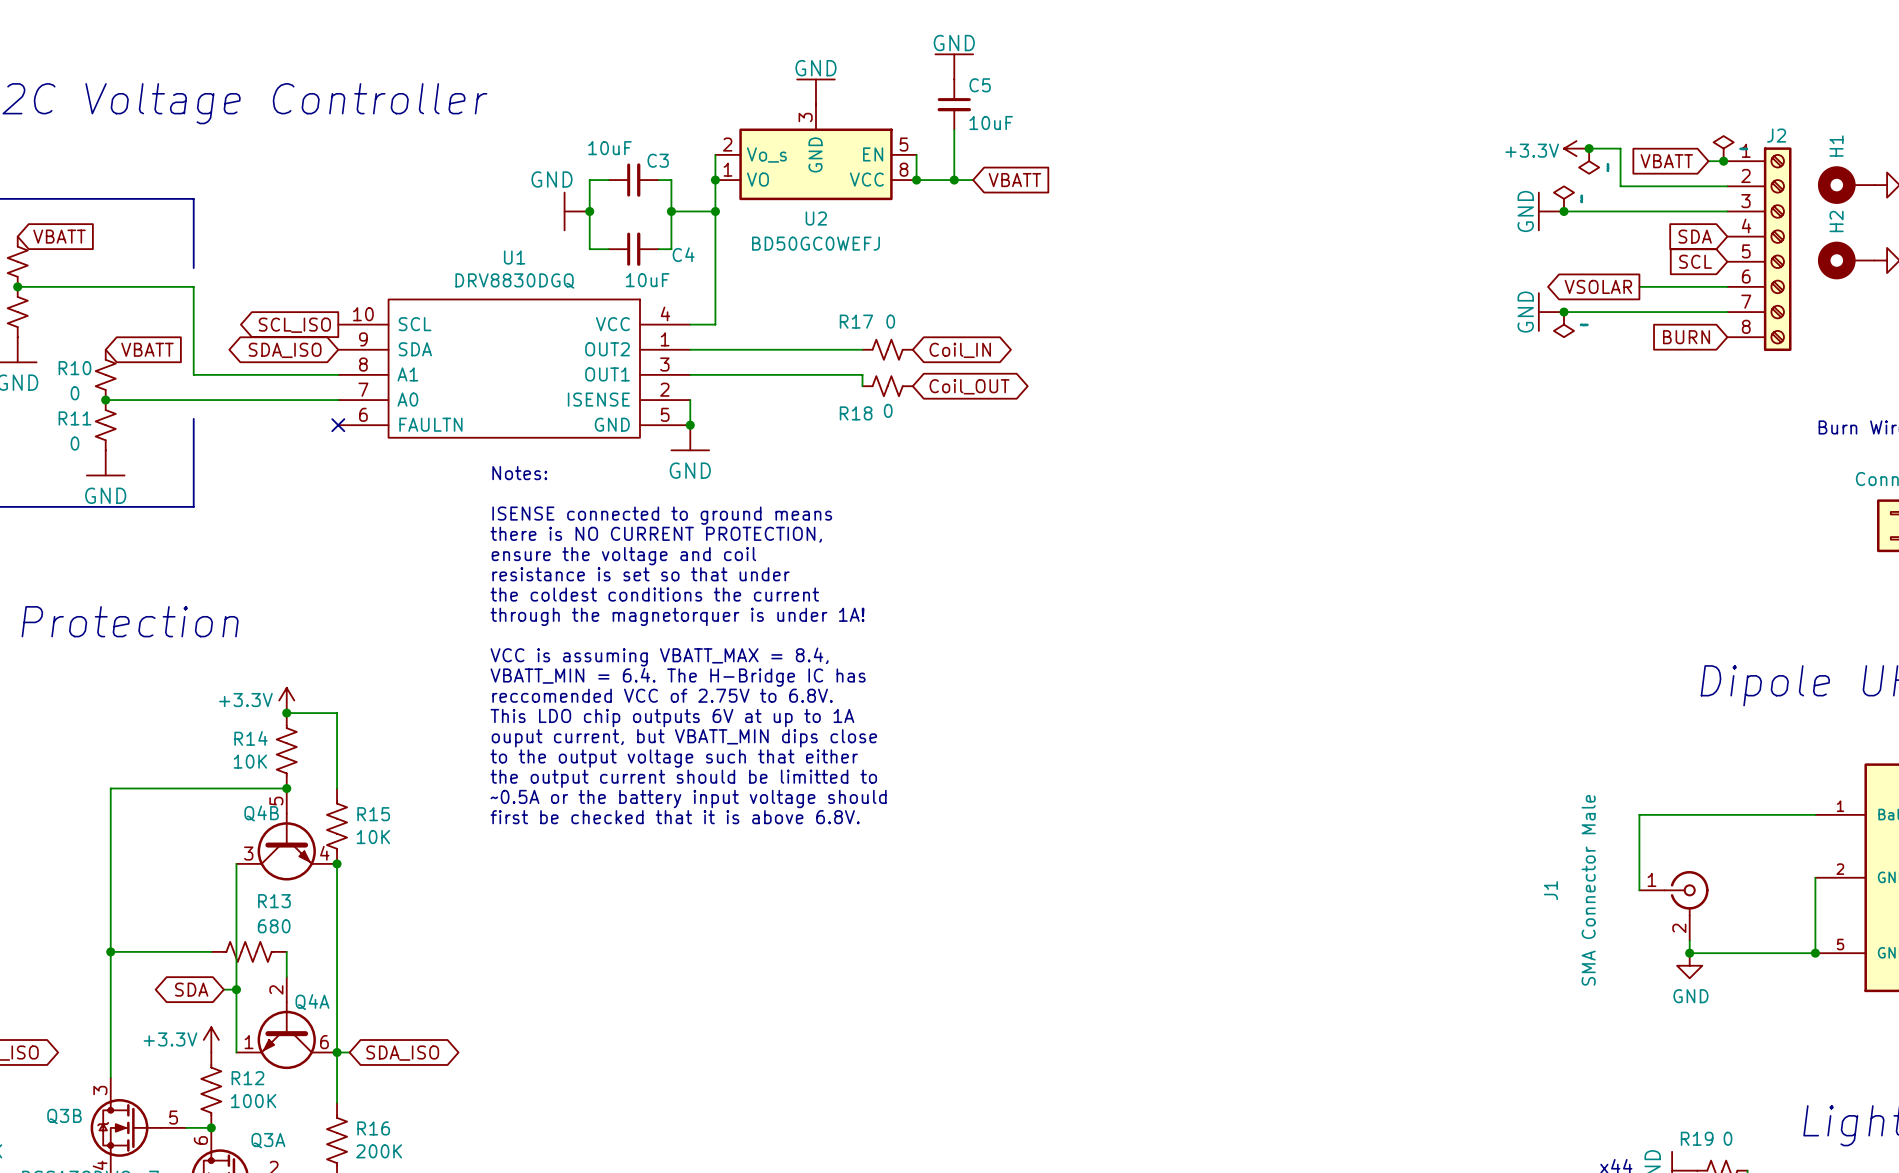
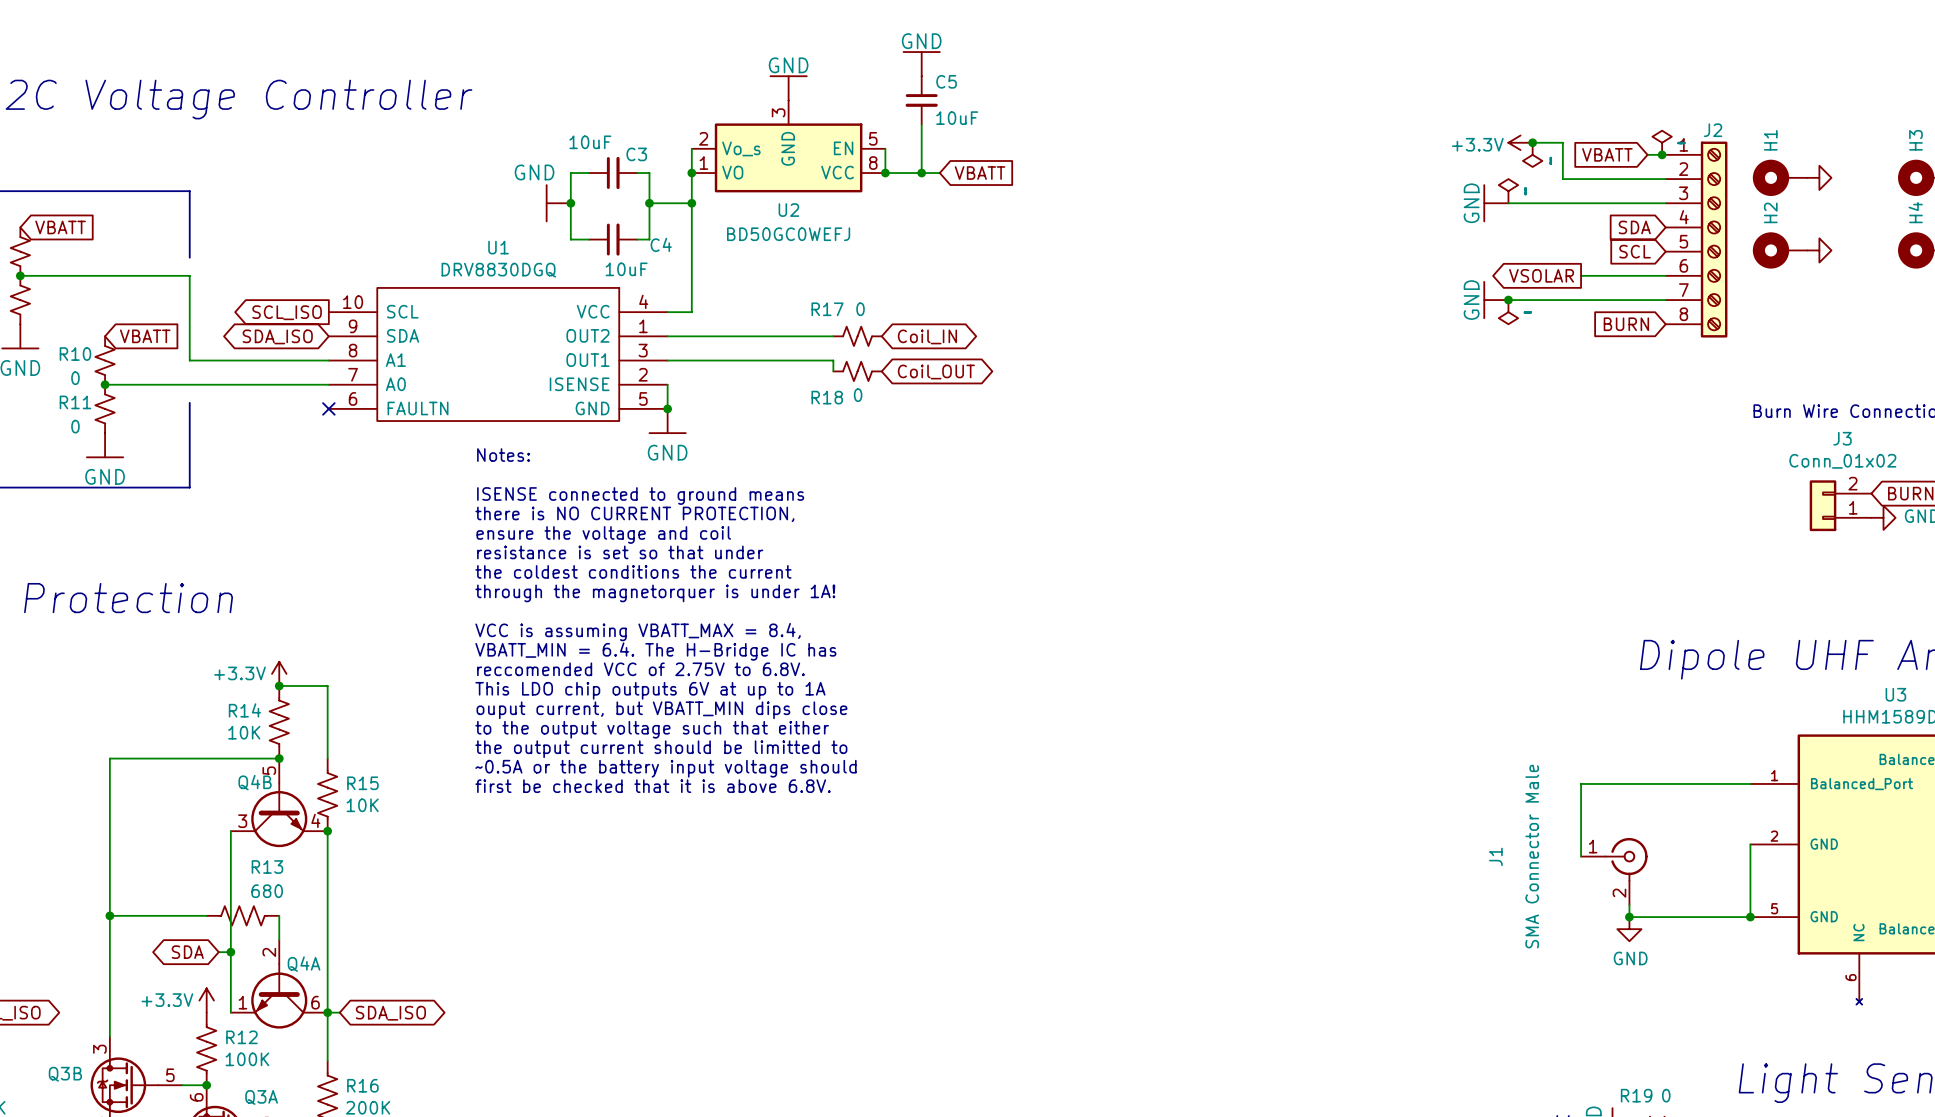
junction: (1563, 211) -> none

